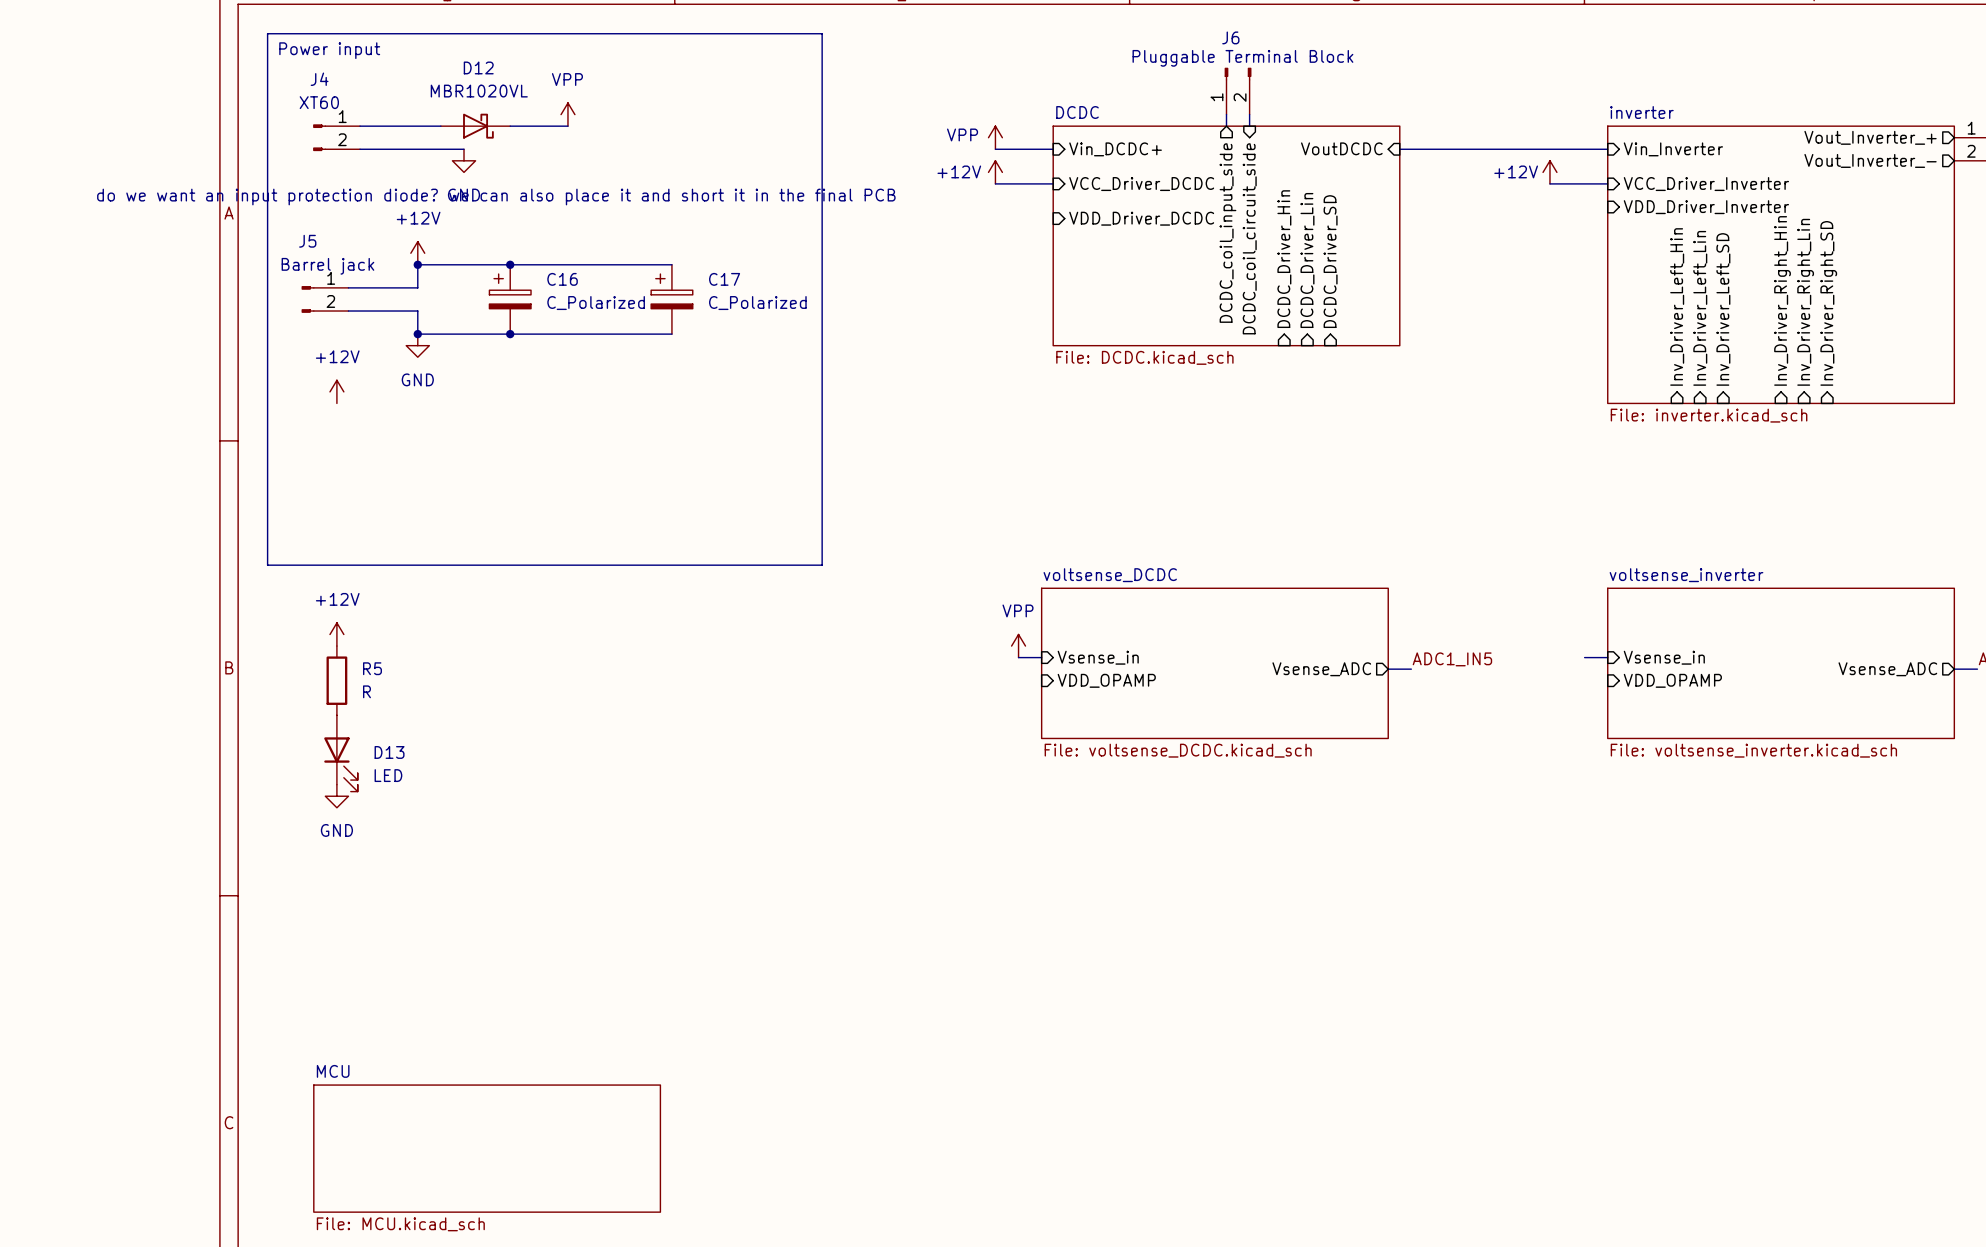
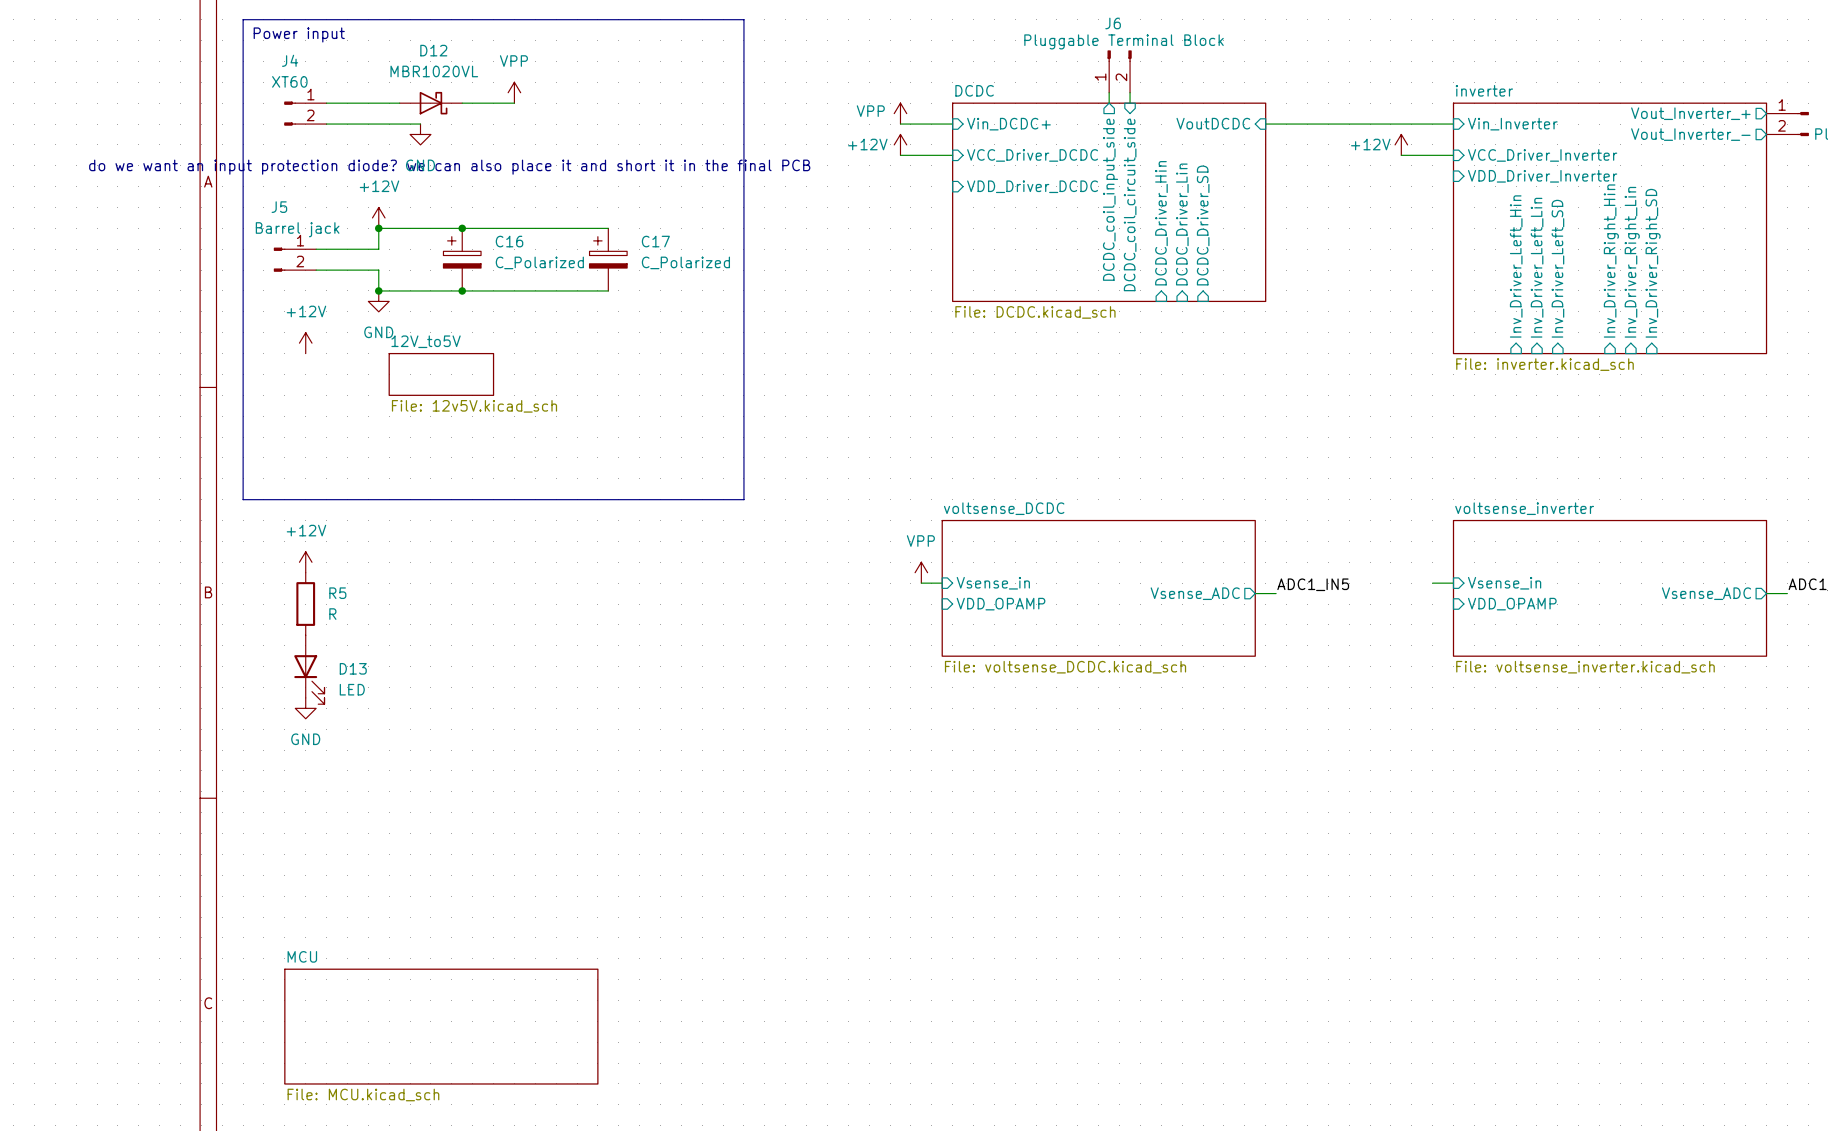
sheet 12V_to5V: none -> File: 12v5V.kicad_sch (441, 374)

